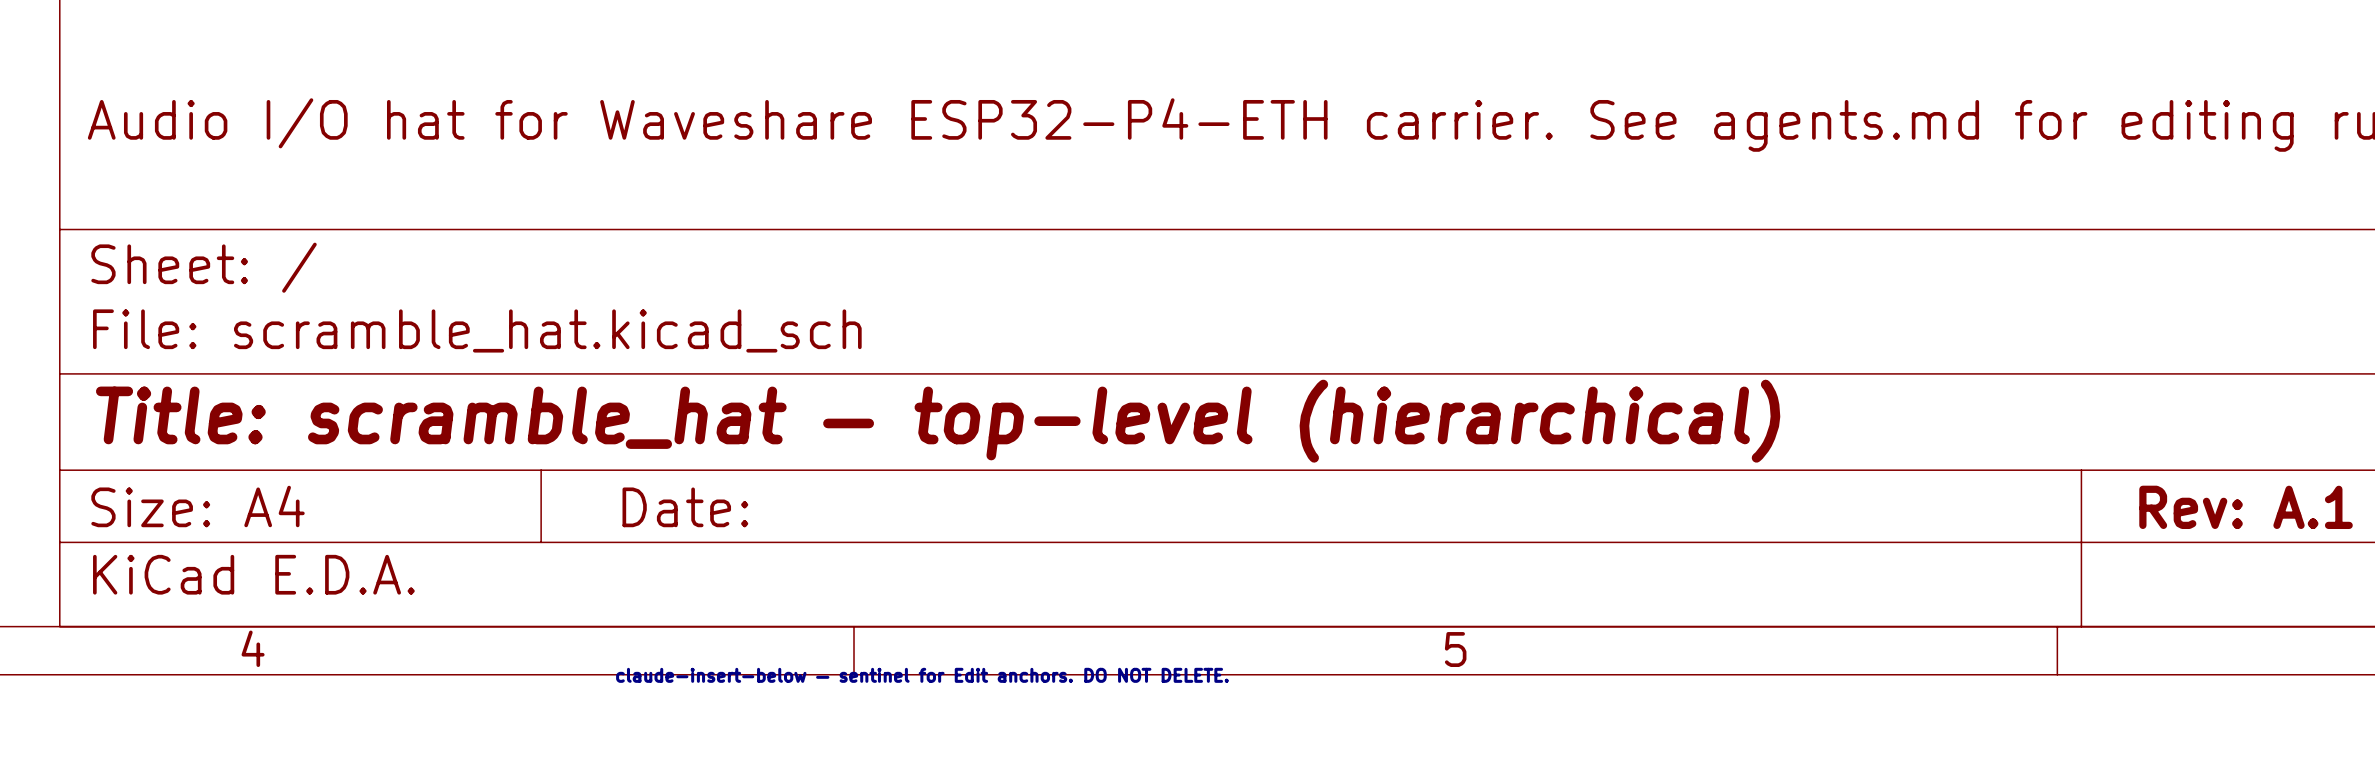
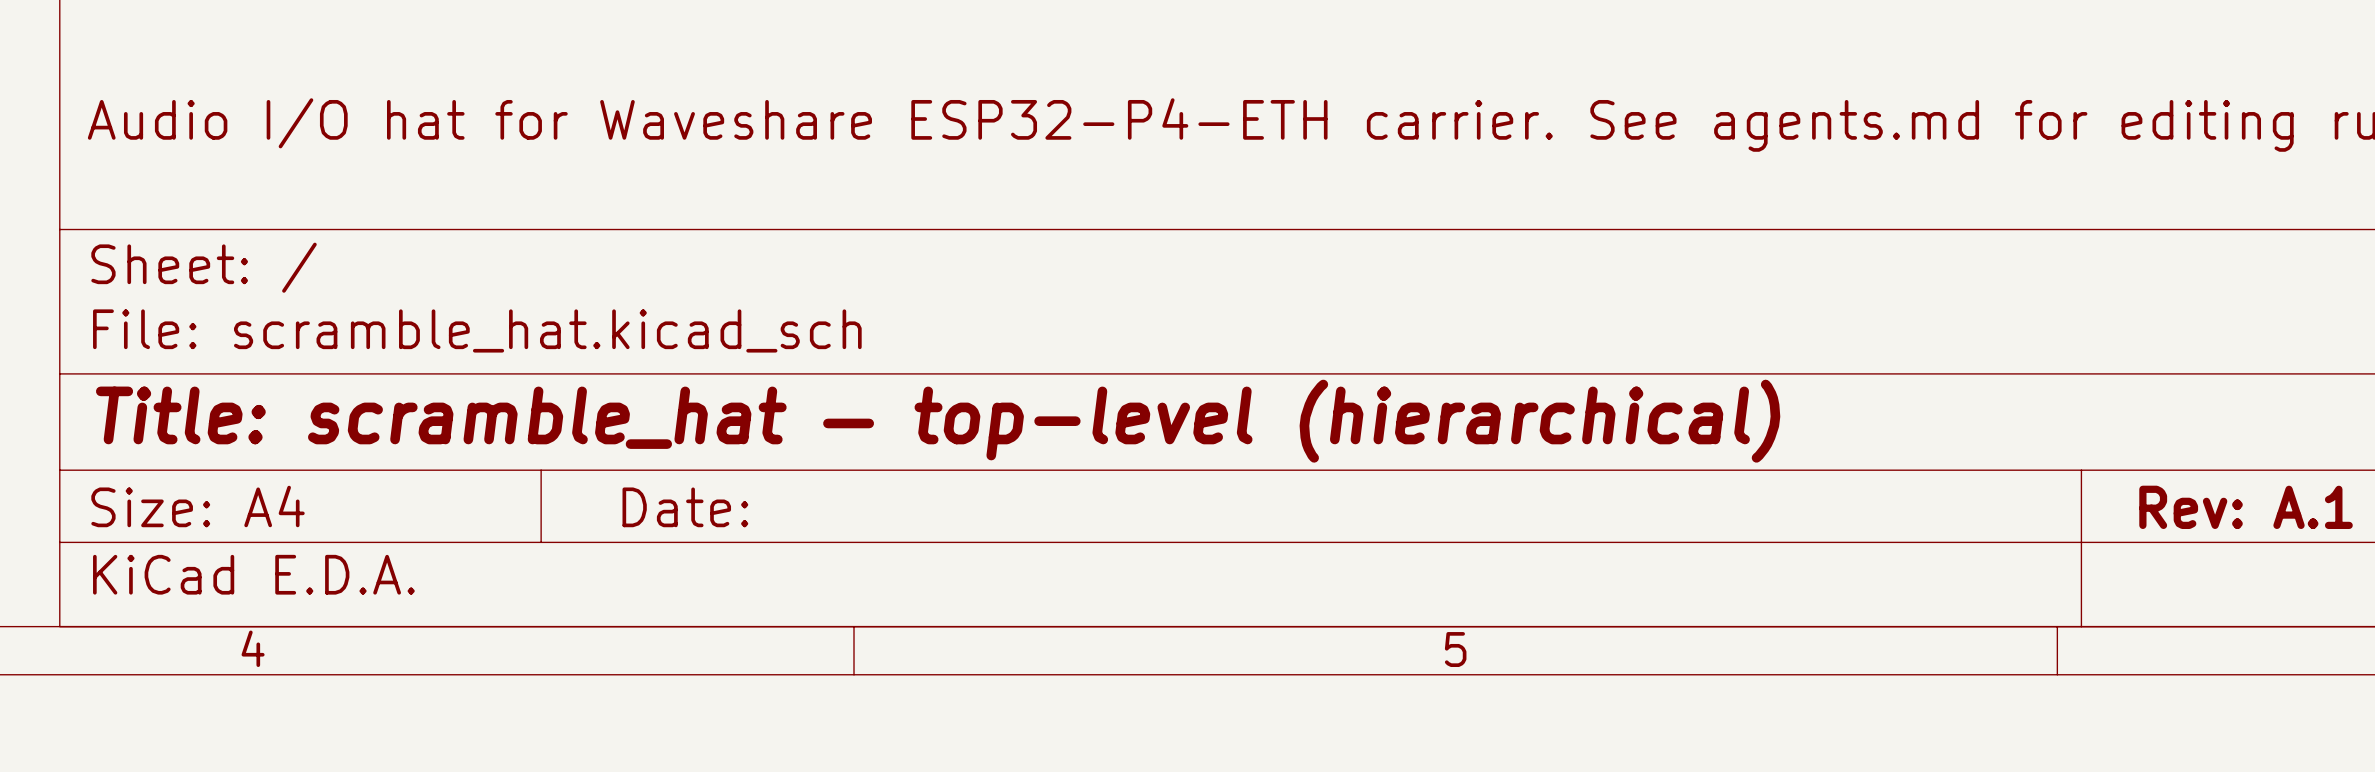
text: claude-insert-below — sentinel for Edit anchors. DO NOT DELETE. (922, 675) -> none

